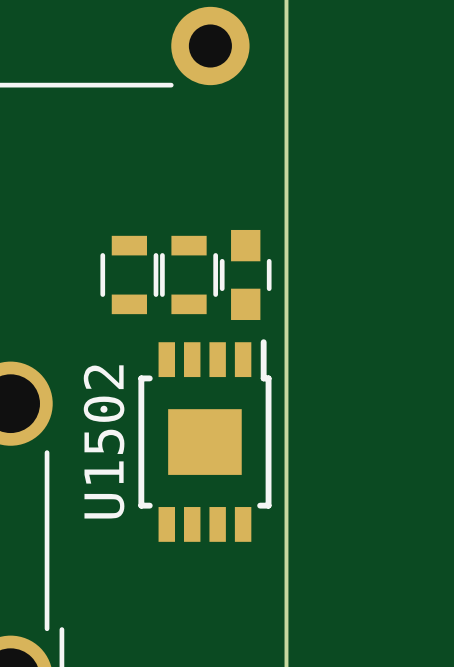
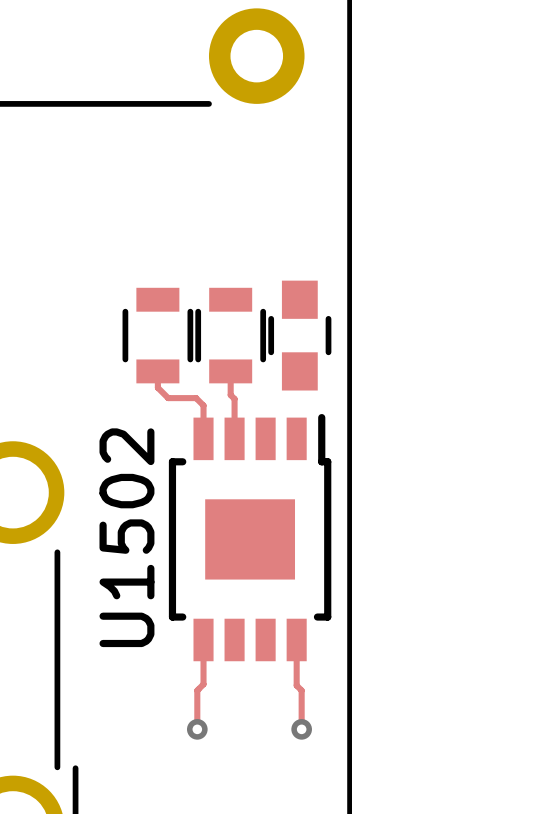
track: none -> (157, 371) (157, 387) (168, 398) (196, 398) (203, 405) (203, 438)
track: none -> (230, 371) (230, 395) (234, 398) (234, 438)
track: none -> (203, 639) (203, 684) (197, 690) (197, 729)
track: none -> (296, 639) (296, 685) (301, 690) (301, 729)
via: none -> (197, 729)
via: none -> (301, 729)

